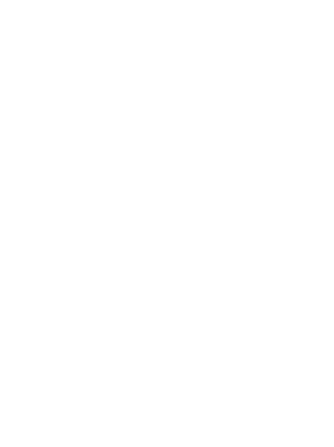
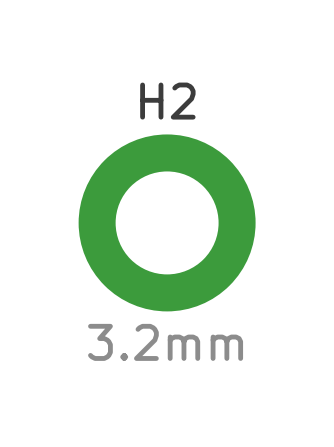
H2: none -> 3.2mm (167, 222)

